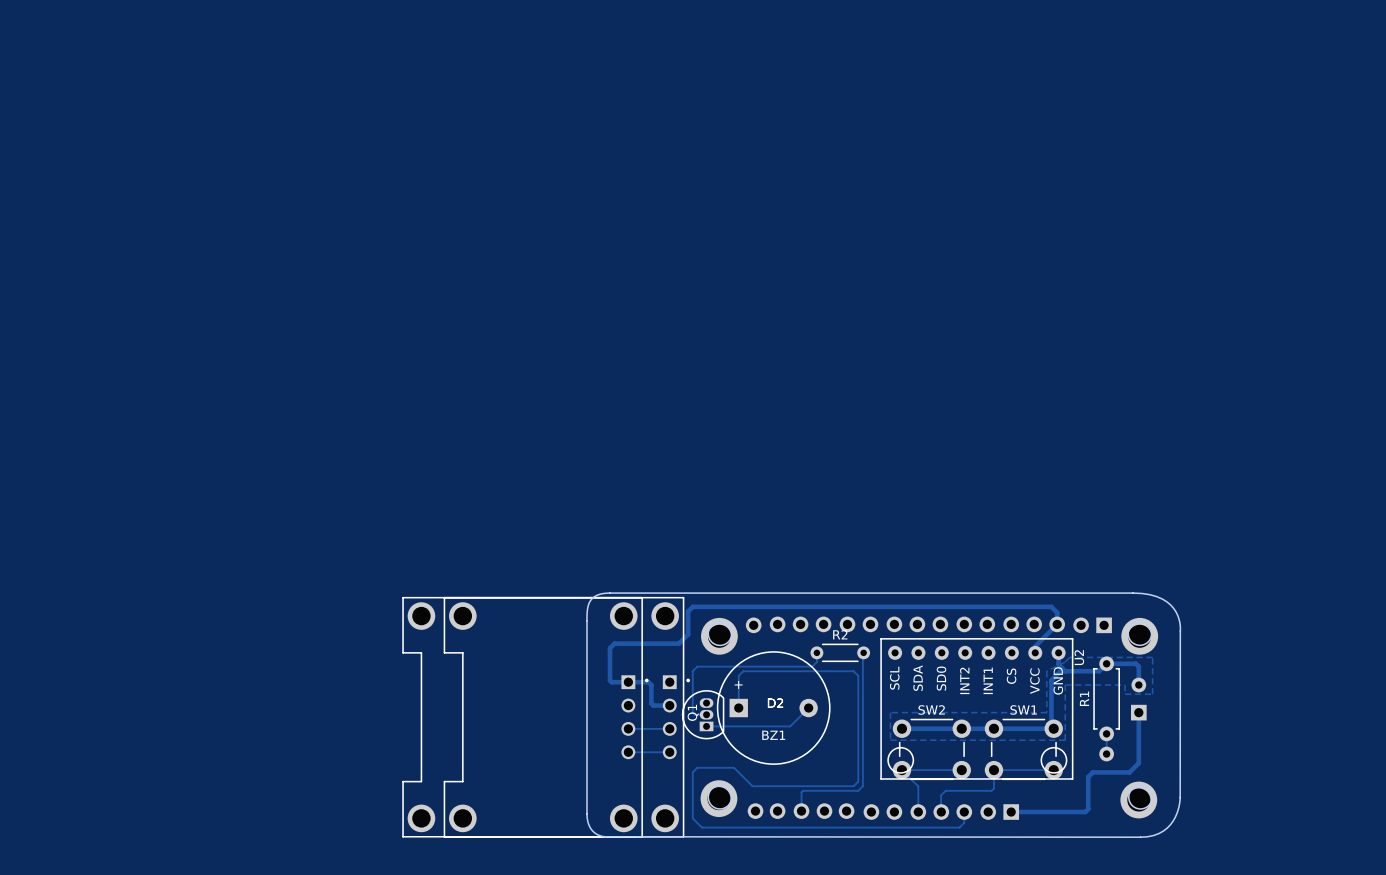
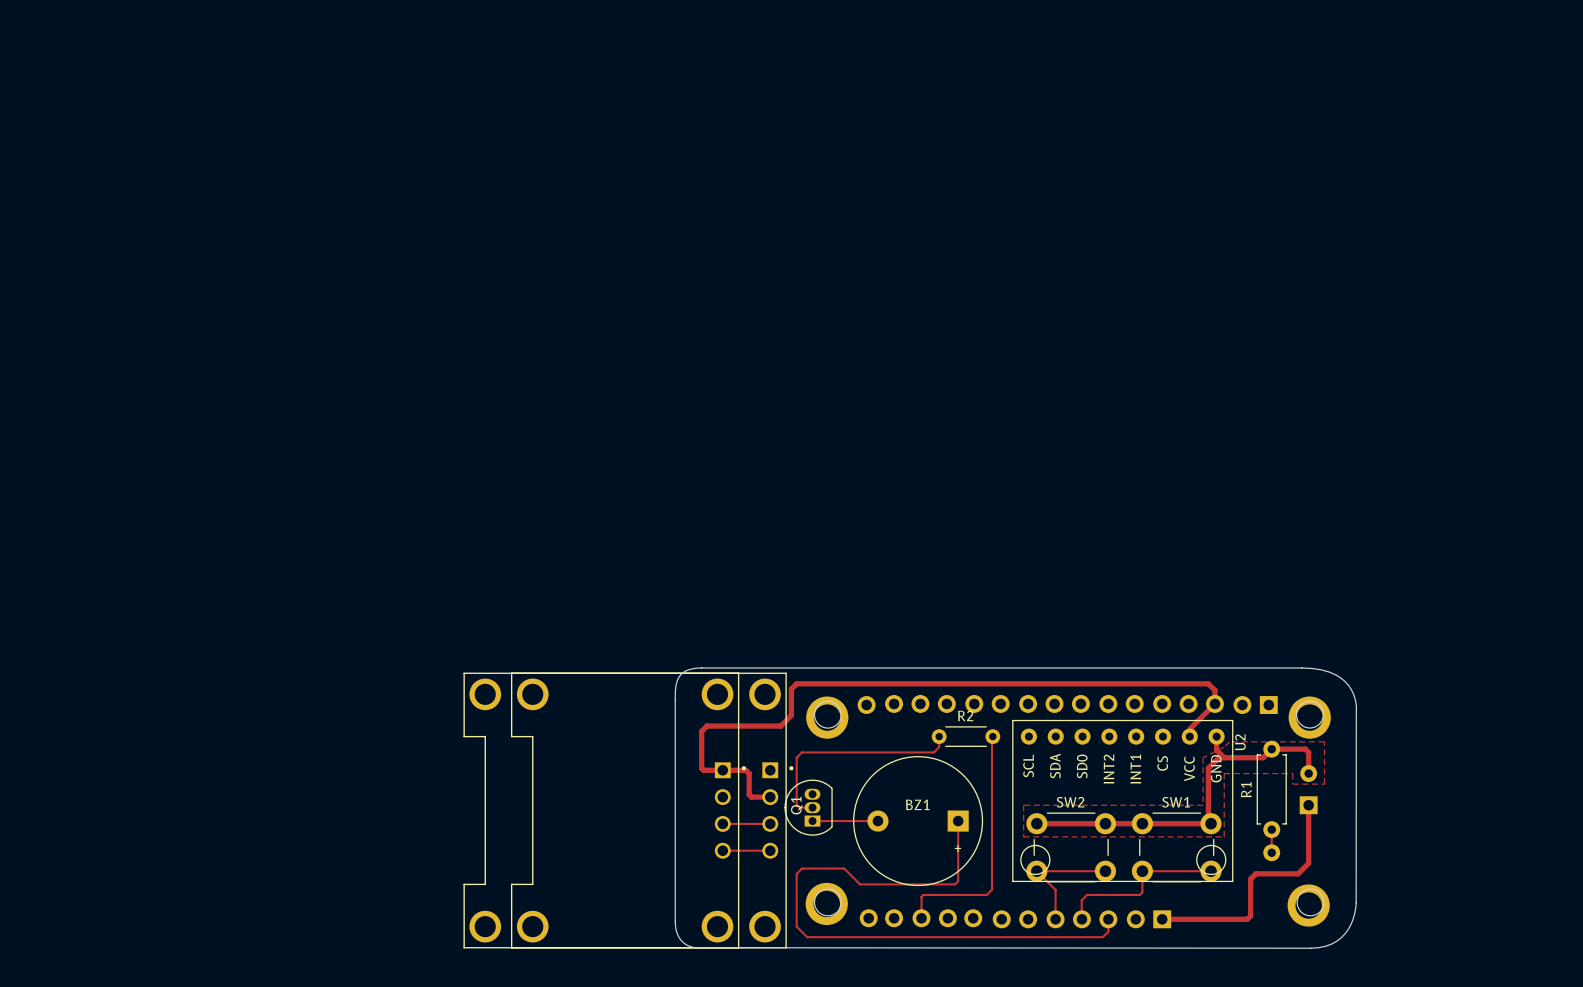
track: (743, 703) (738, 708) (738, 675) (743, 671) (853, 671) (858, 675) (858, 781) (853, 786) (752, 786) (747, 781) -> (958, 821) (958, 881) (955, 884) (860, 884)
D2: (775, 703) -> none
BZ1 rotation: 0° (773, 708) -> 180° (918, 821)
track: (808, 708) (790, 726) (763, 726) -> none

